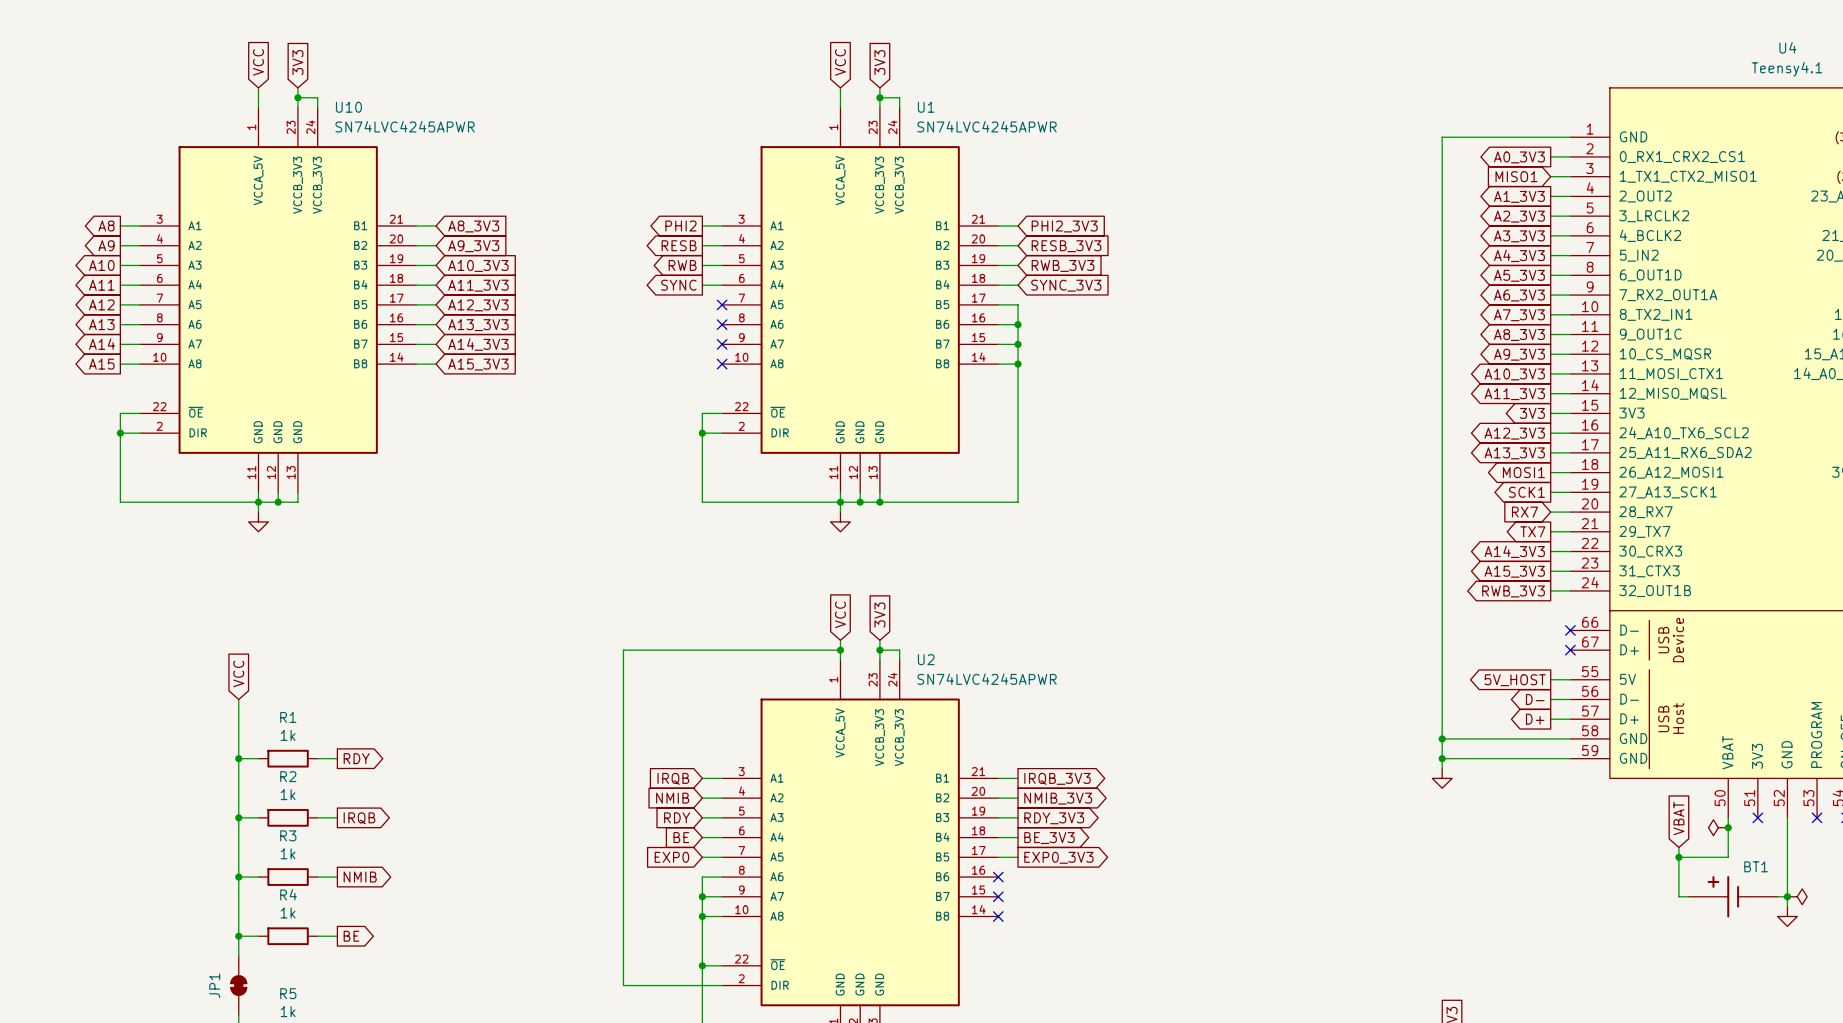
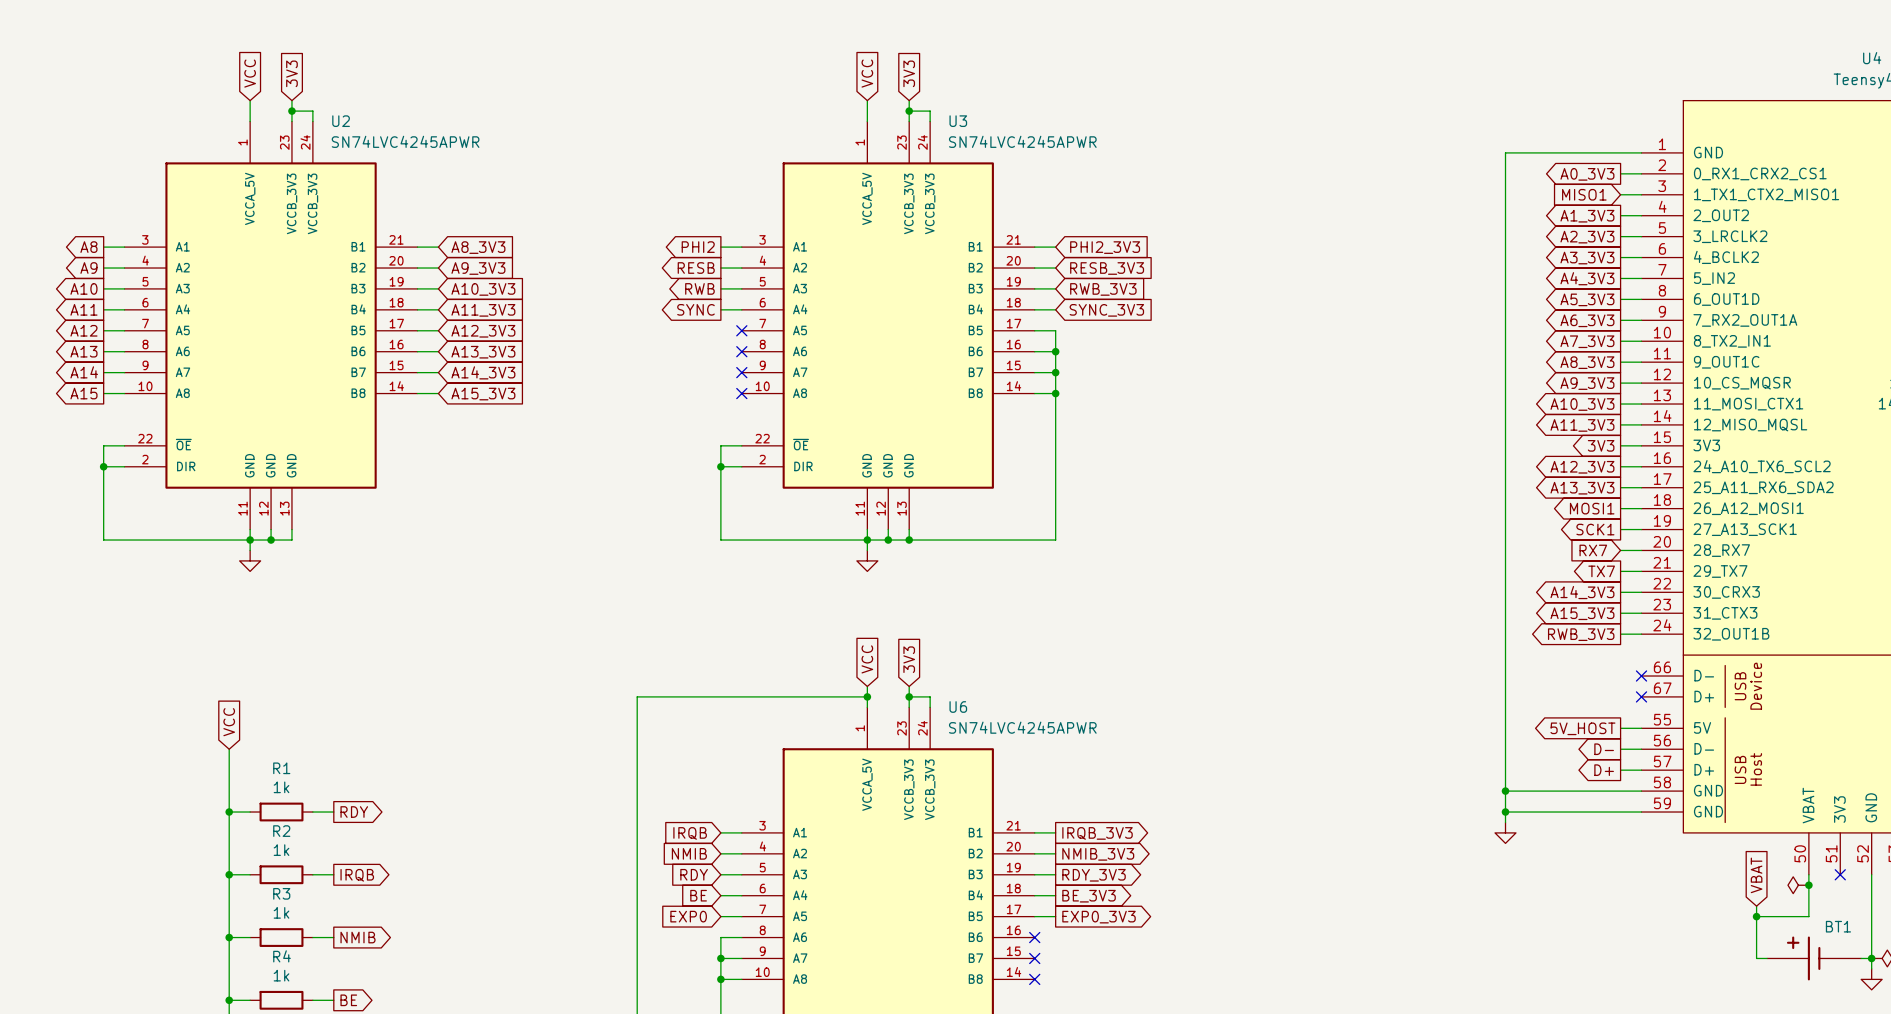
U10 name: U10 (348, 107) -> U2 (341, 121)
U1 name: U1 (926, 107) -> U3 (958, 121)
U2 name: U2 (926, 659) -> U6 (958, 707)

